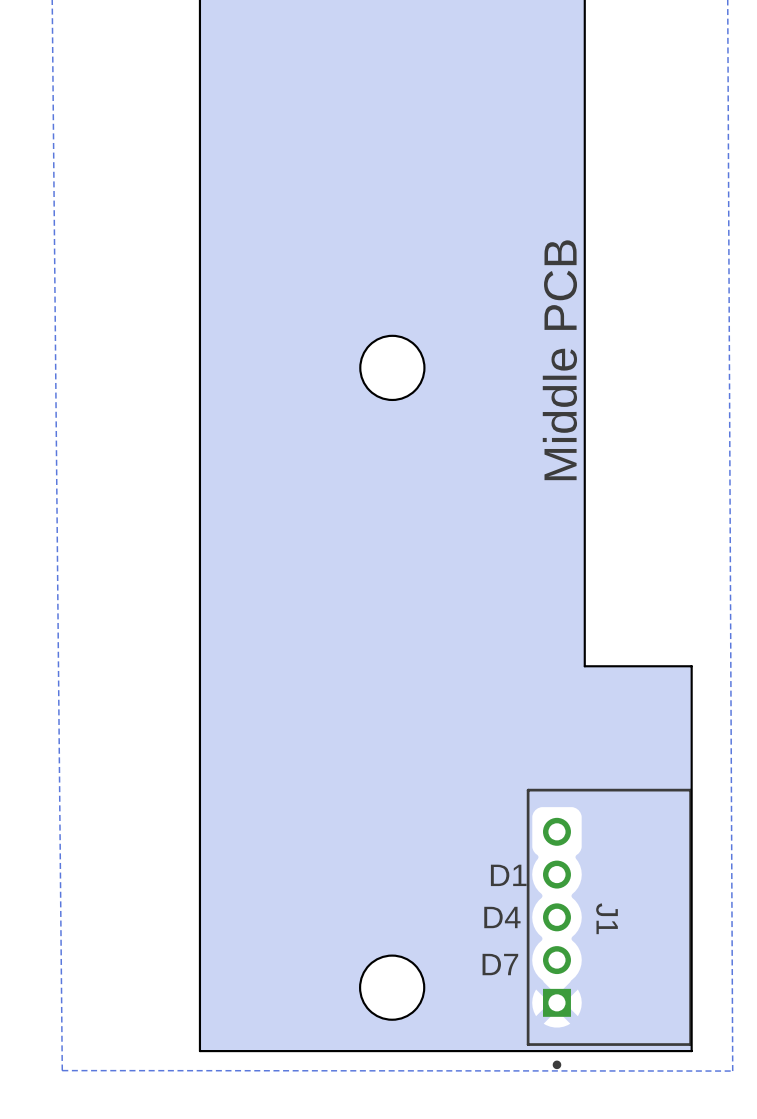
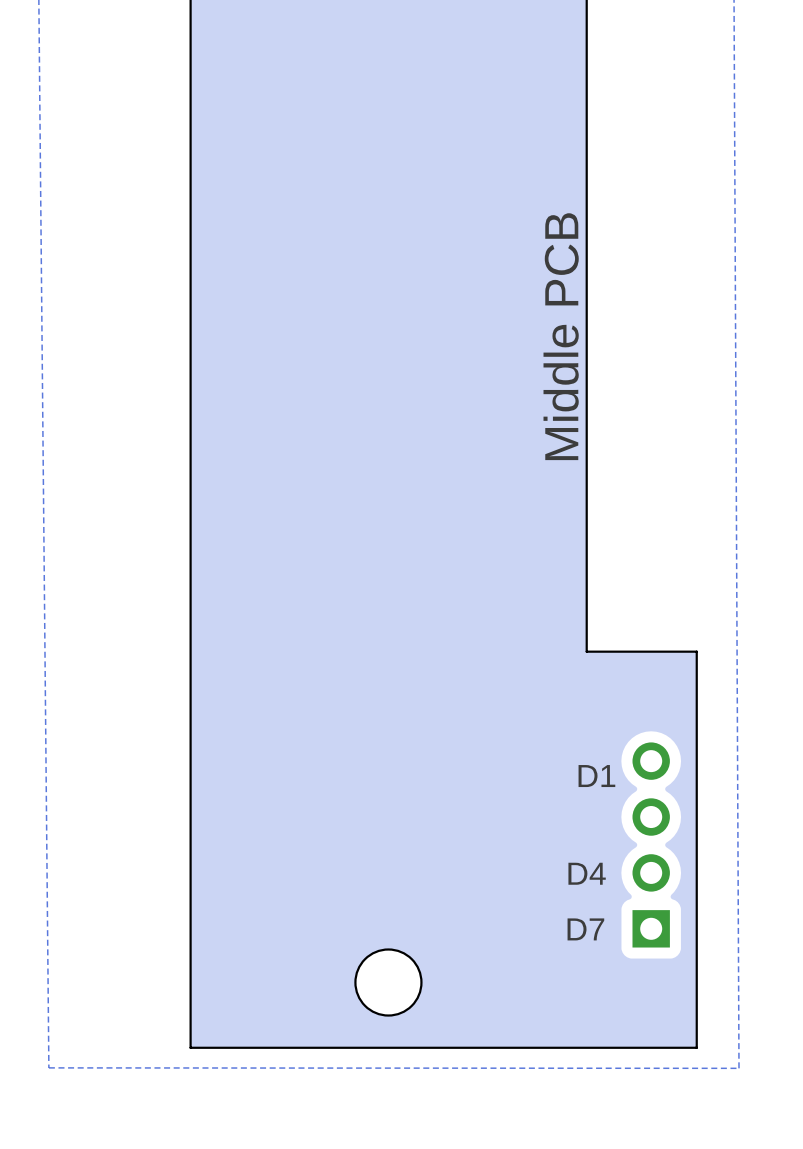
round board edge: [359, 334, 426, 402] -> none
part: none -> (651, 844)
text position: D1 (508, 875) -> D1 (596, 776)
text position: D4 (502, 917) -> D4 (587, 873)
J1: (609, 928) -> none
text position: D7 (500, 964) -> D7 (585, 929)

